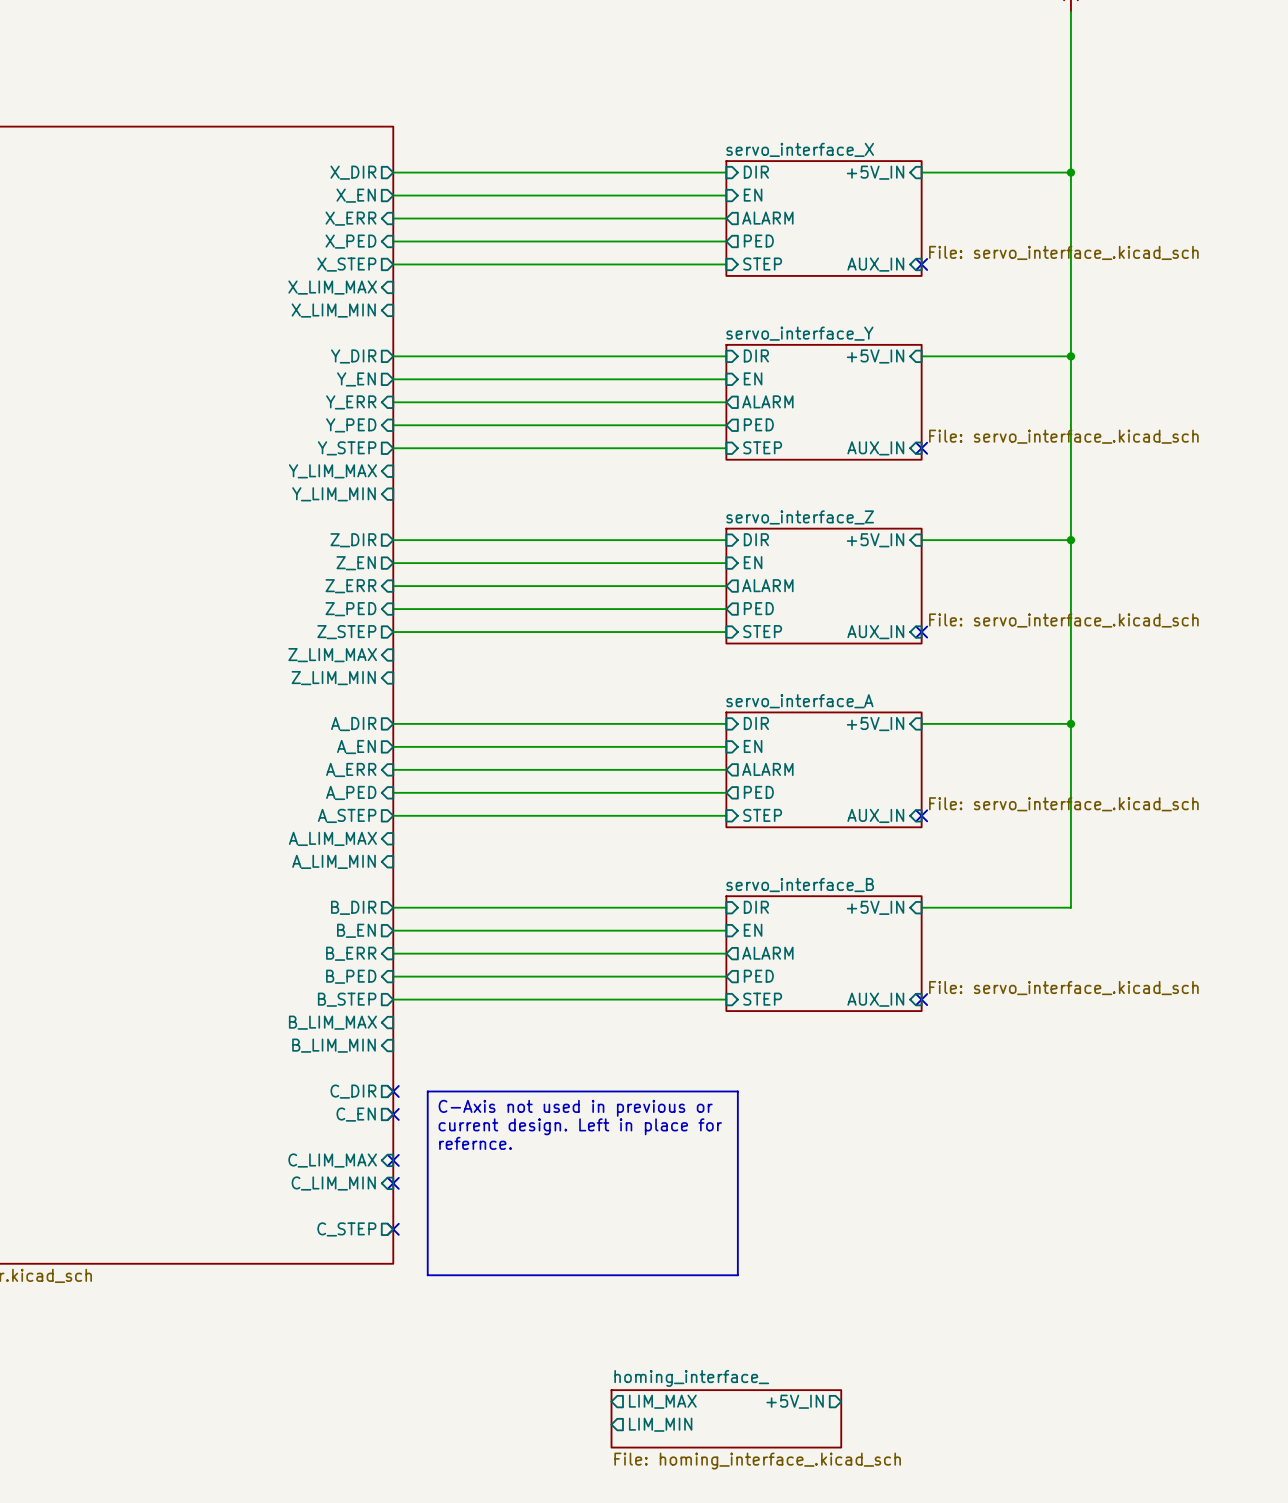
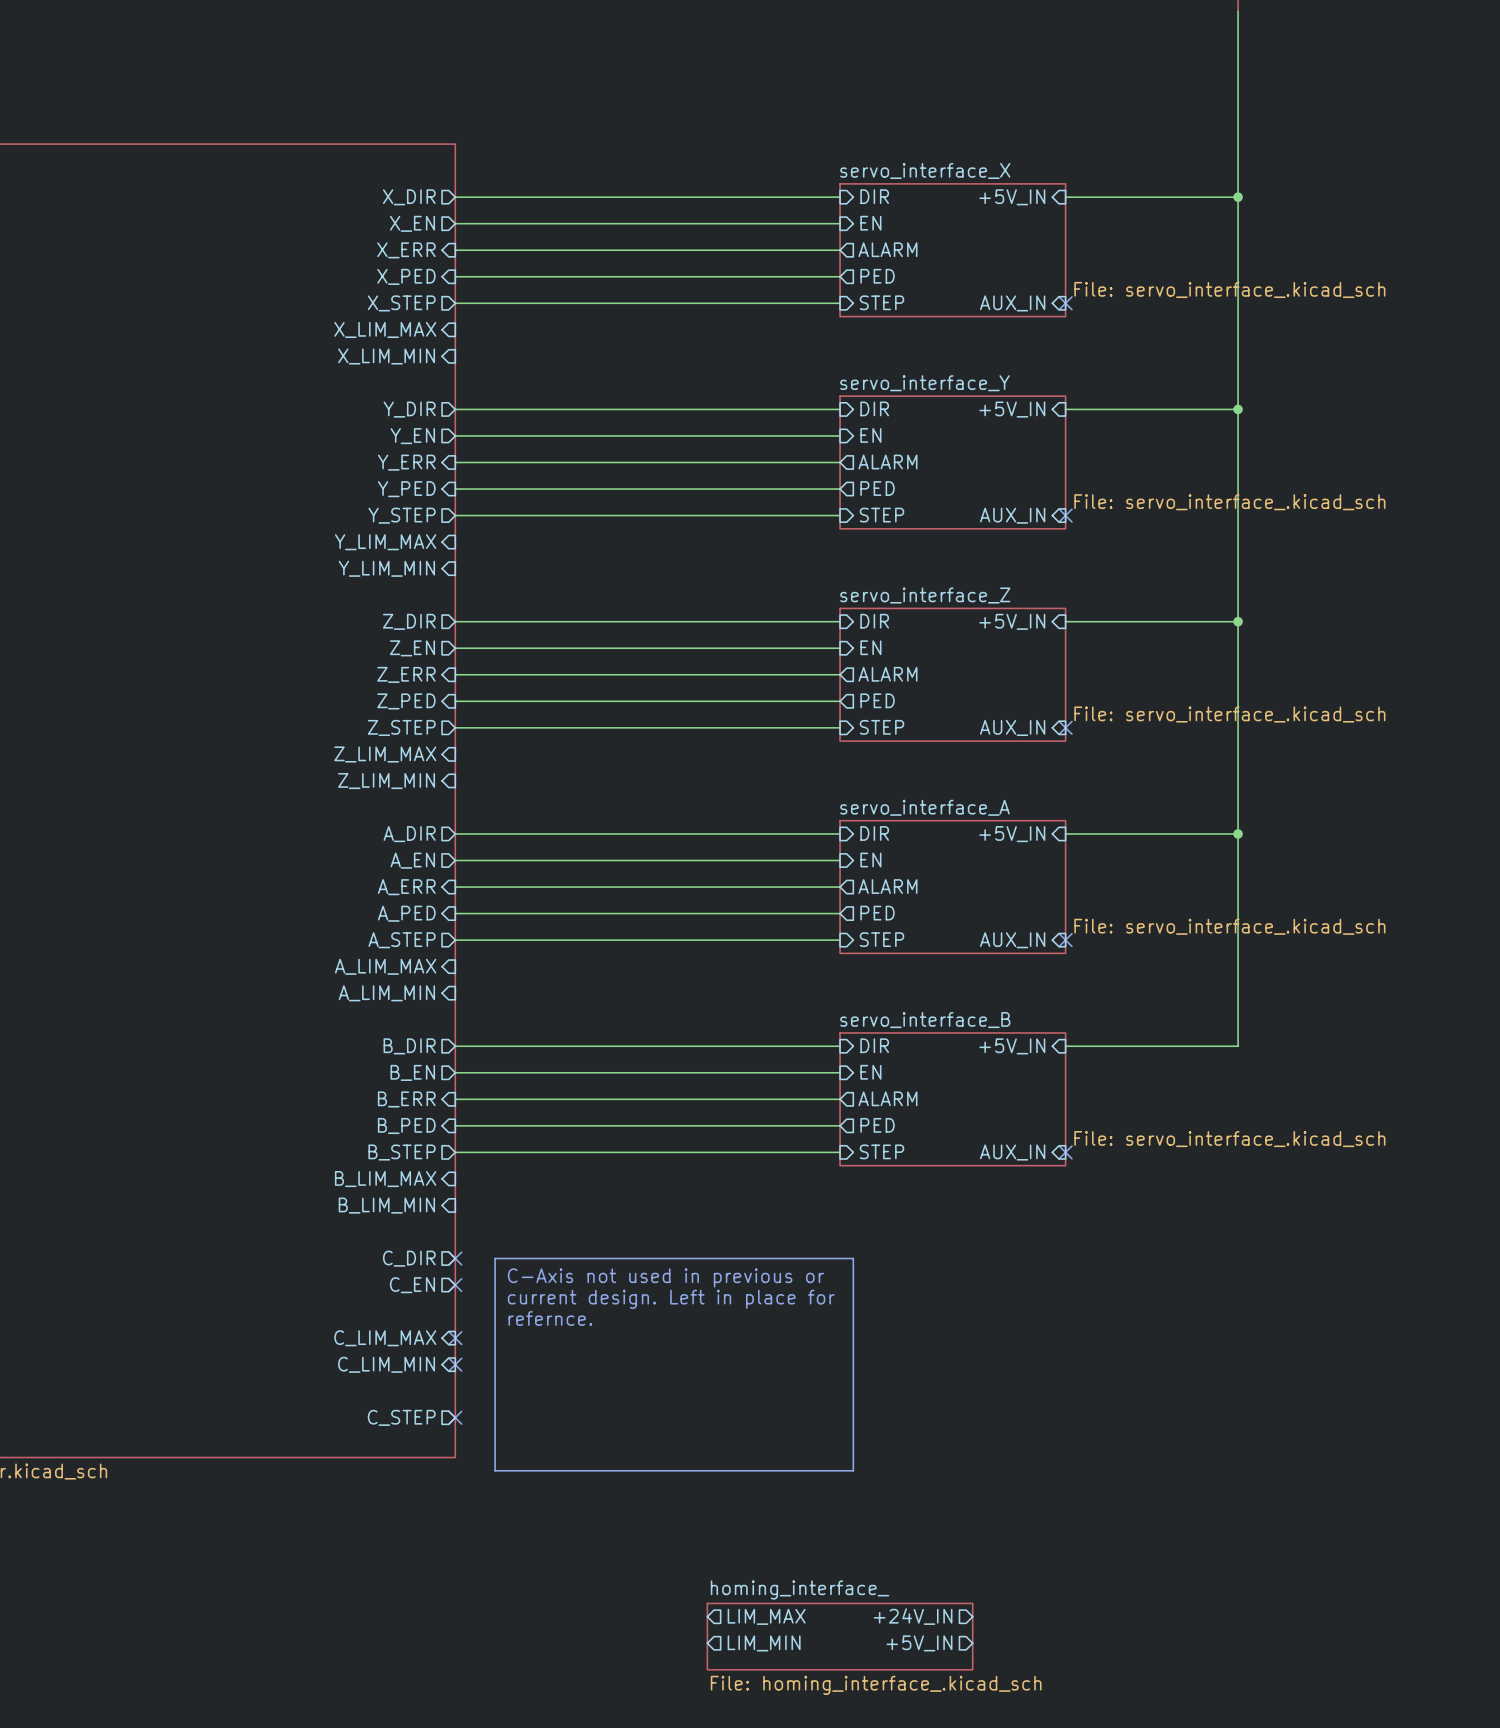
sheet pin: +5V_IN (795, 1401) -> +24V_IN (913, 1616)
sheet pin: none -> +5V_IN (919, 1643)

